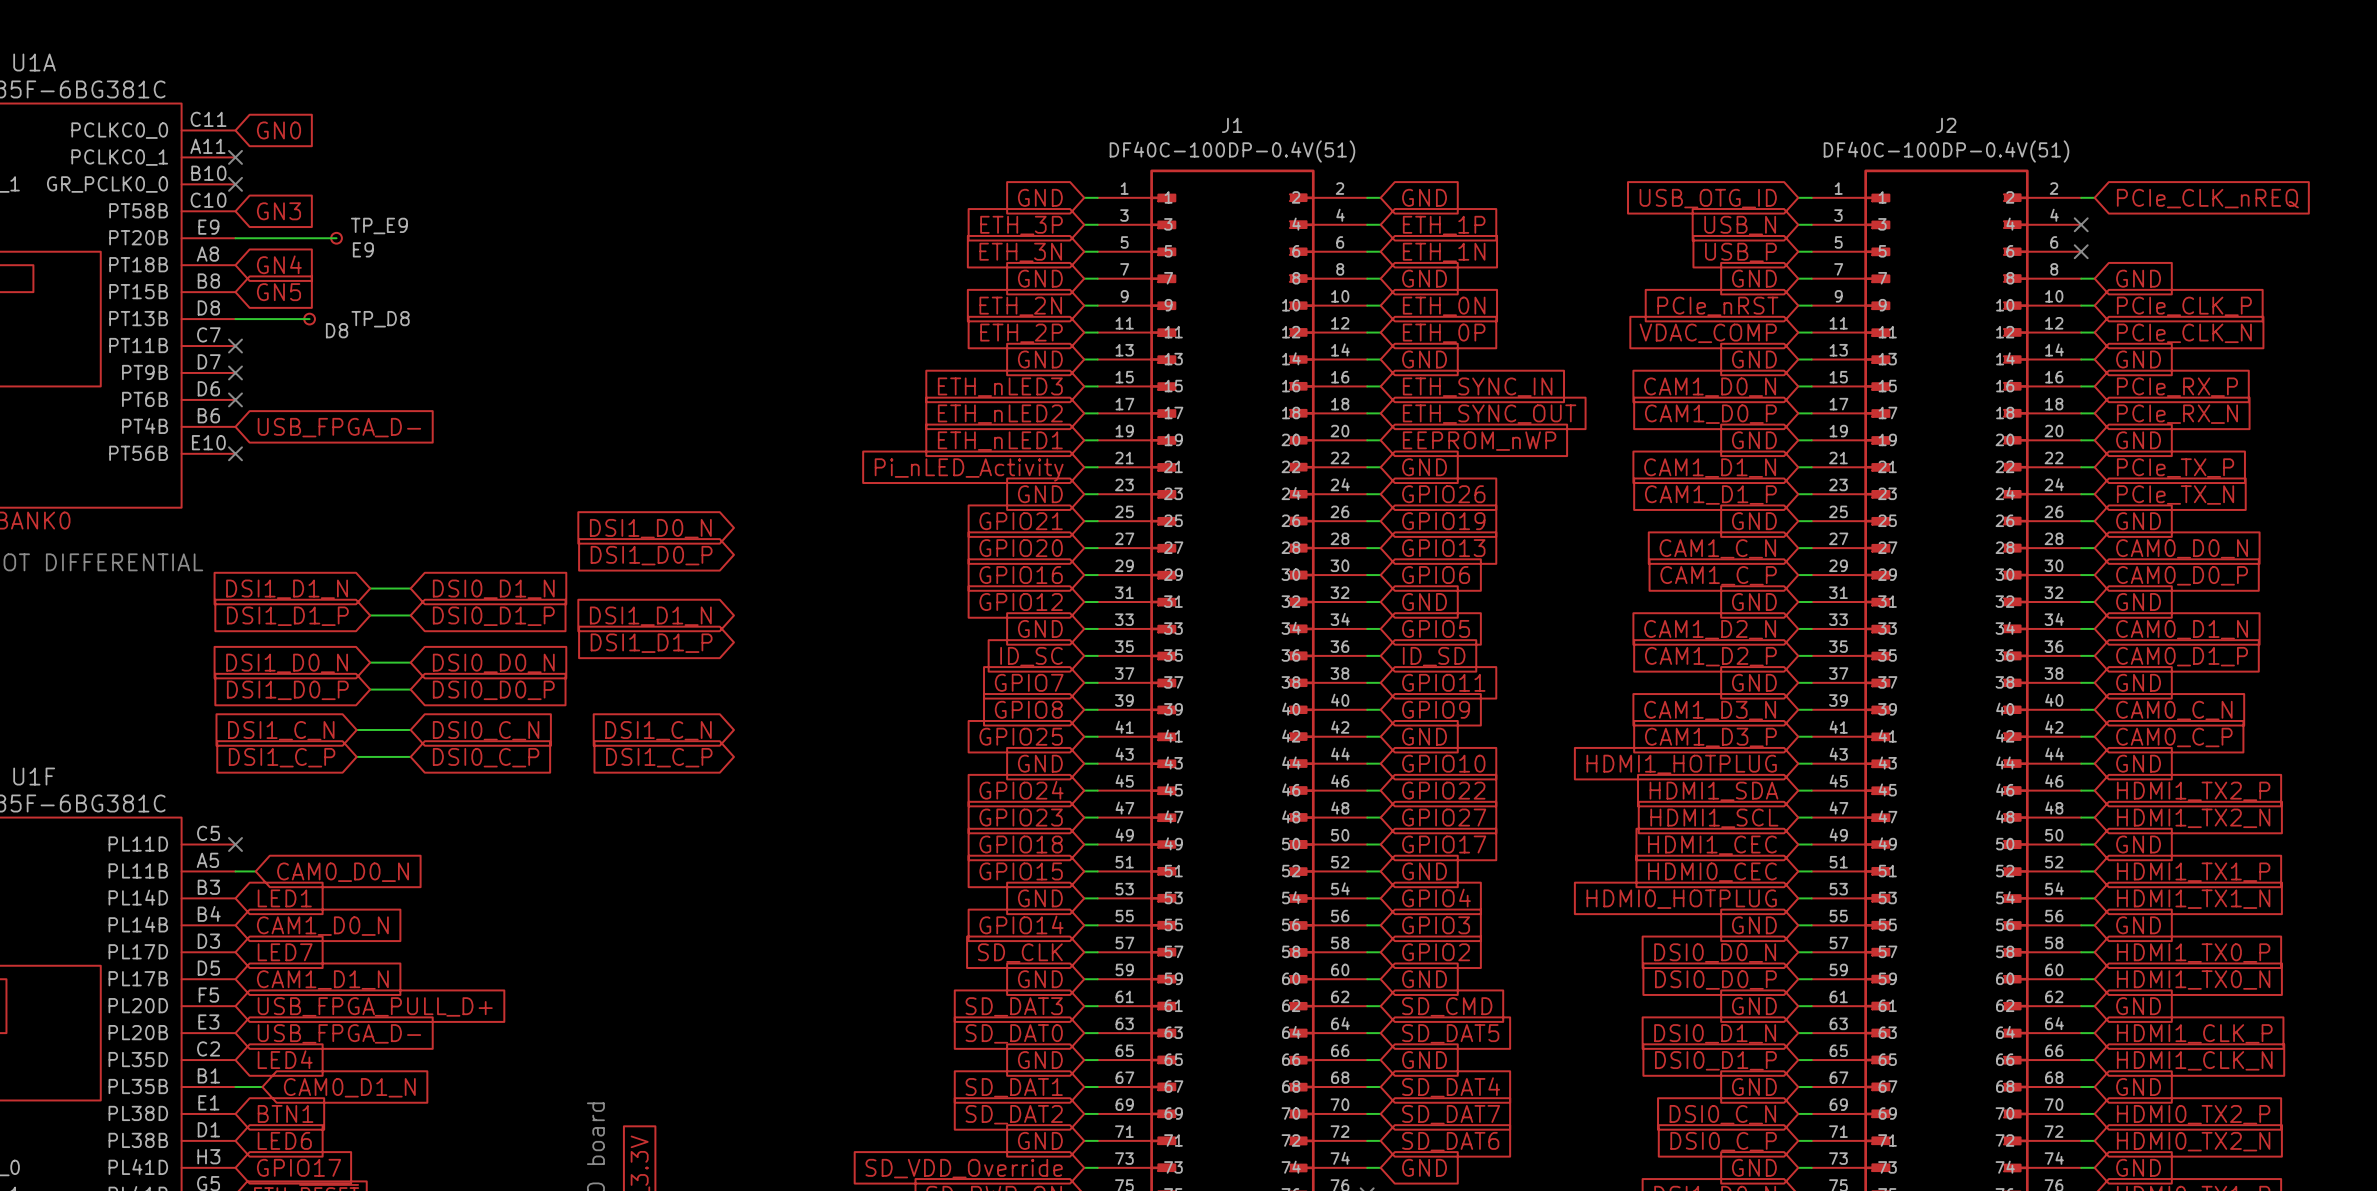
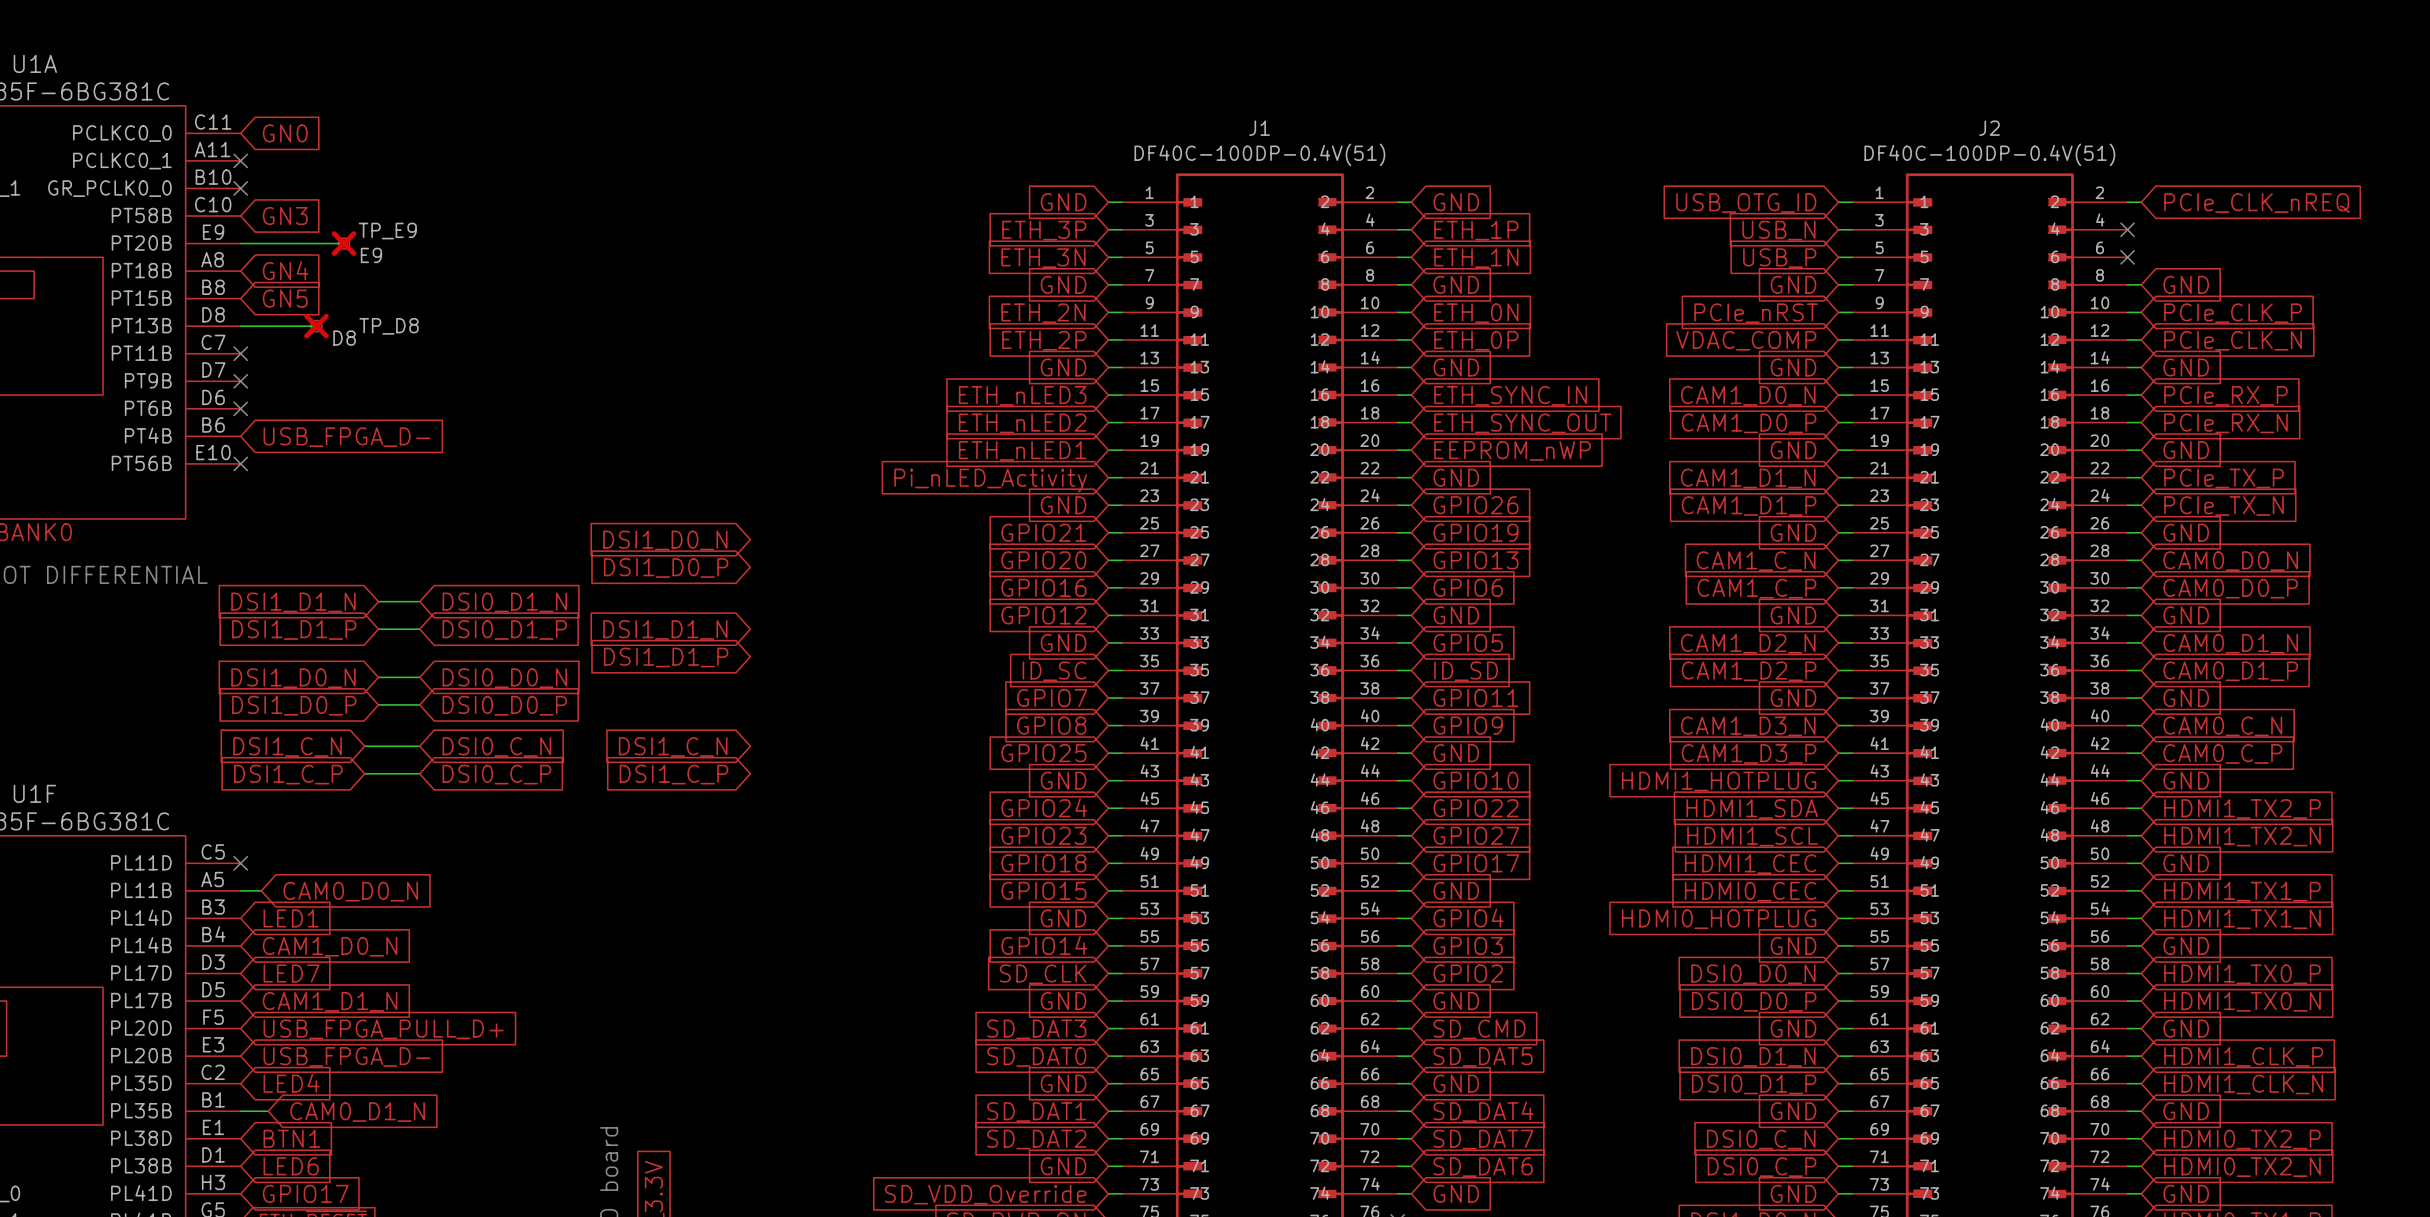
TP_E9 do-not-place cross: none -> (344, 243)
TP_D8 do-not-place cross: none -> (316, 326)

